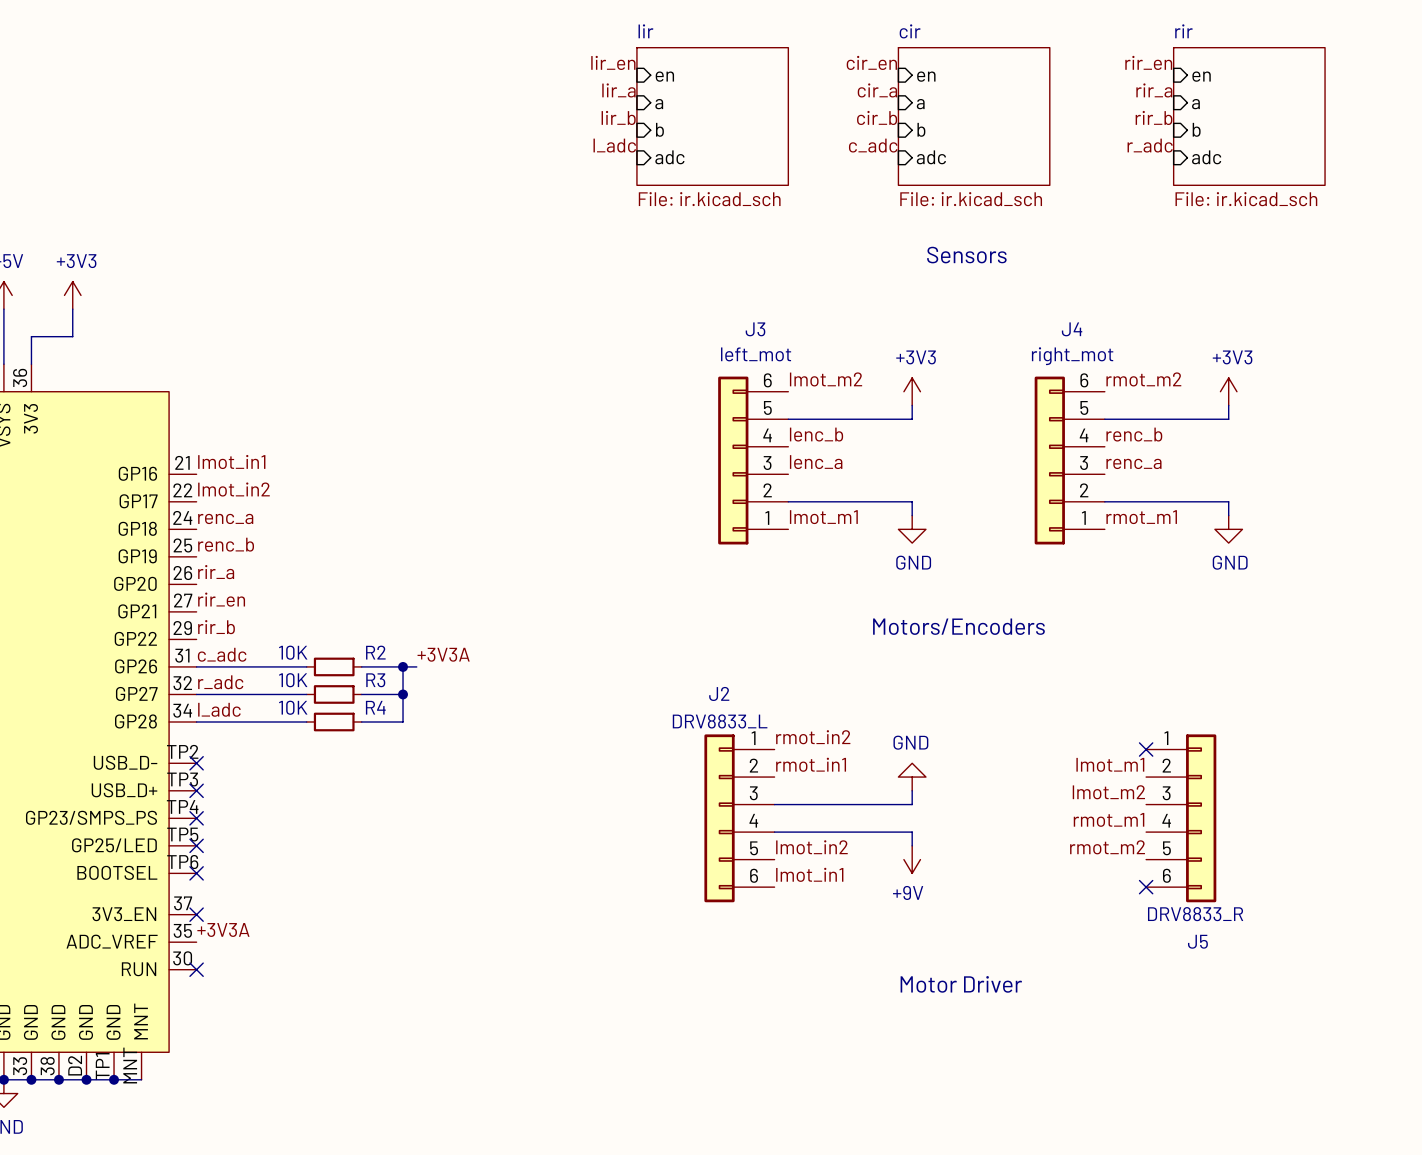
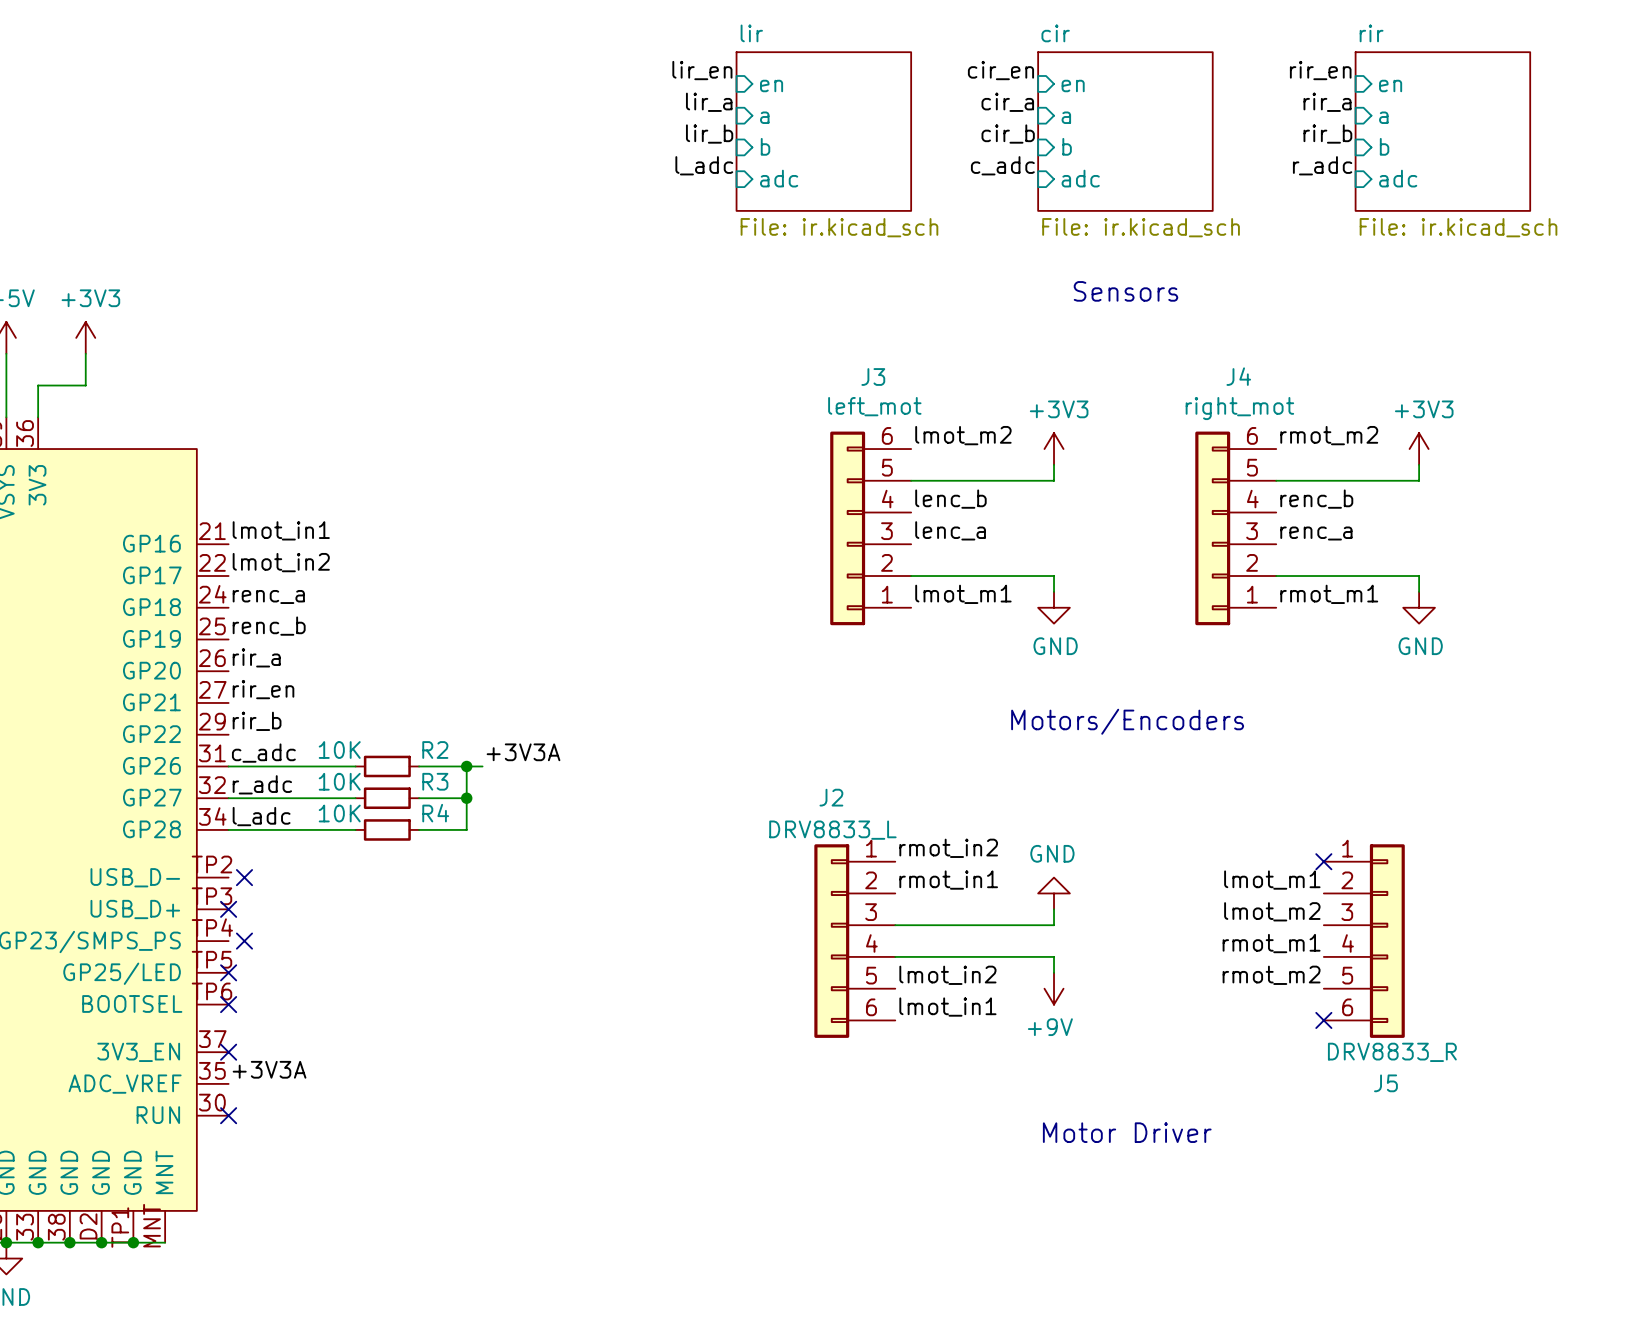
no-connect mark position: (196, 763) -> (244, 877)
no-connect mark position: (196, 818) -> (244, 941)

